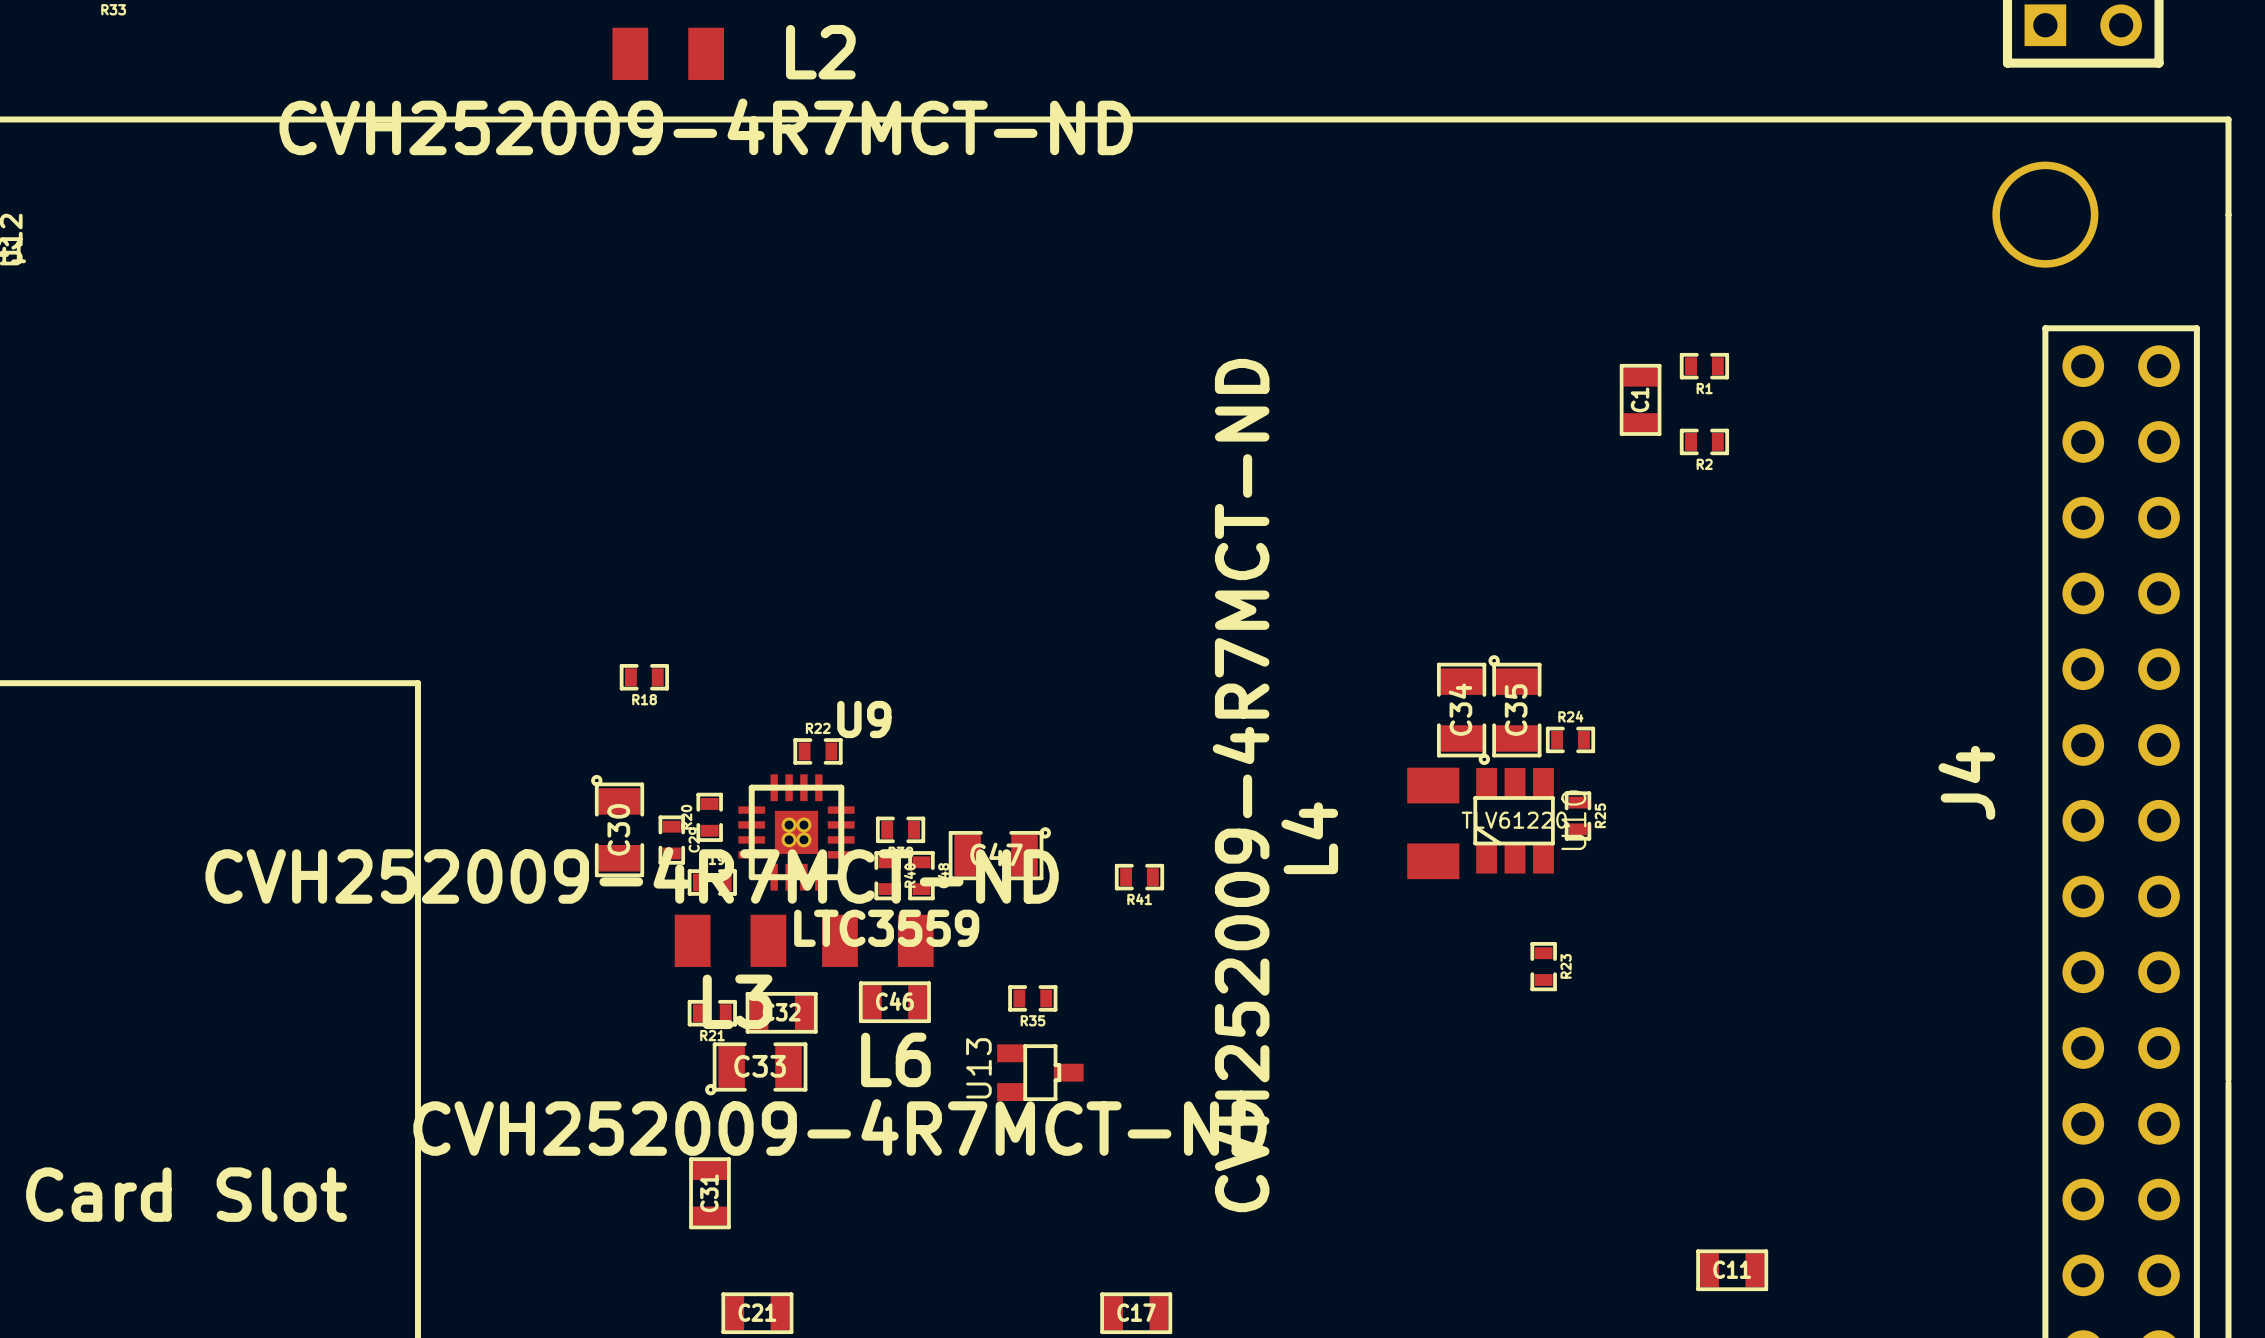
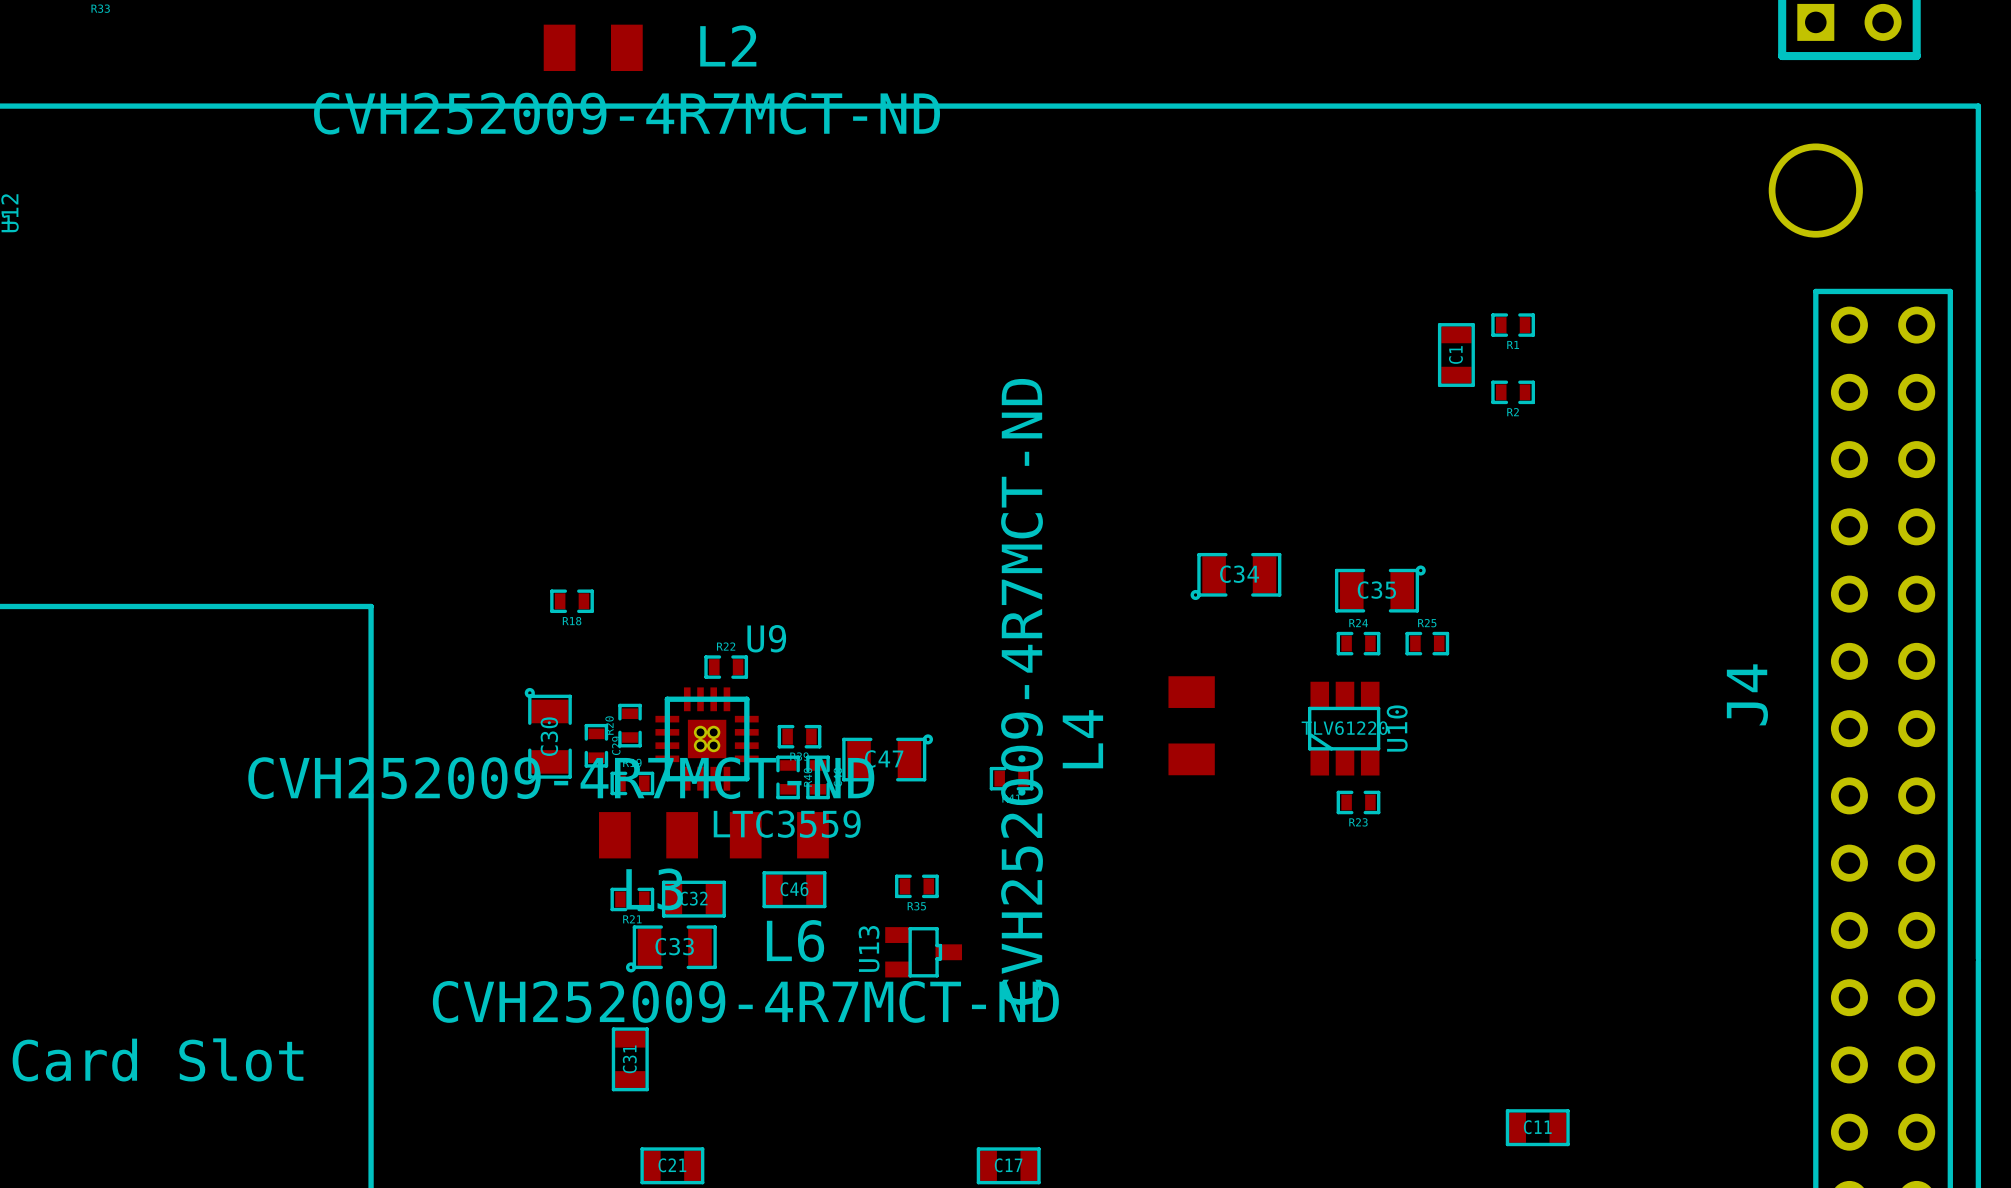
C35 rotation: 0° (1514, 706) -> 90° clockwise (1380, 589)
C34 rotation: 0° (1463, 713) -> 90° clockwise (1235, 576)
C34 position: (1463, 713) -> (1235, 576)
R24 position: (1570, 739) -> (1358, 643)
R25 rotation: 0° (1578, 815) -> 90° clockwise (1427, 643)
R25 position: (1578, 815) -> (1427, 643)
L4 position: (1433, 823) -> (1191, 725)
R23 rotation: 0° (1543, 966) -> 90° clockwise (1358, 802)
R23 position: (1543, 966) -> (1358, 802)

